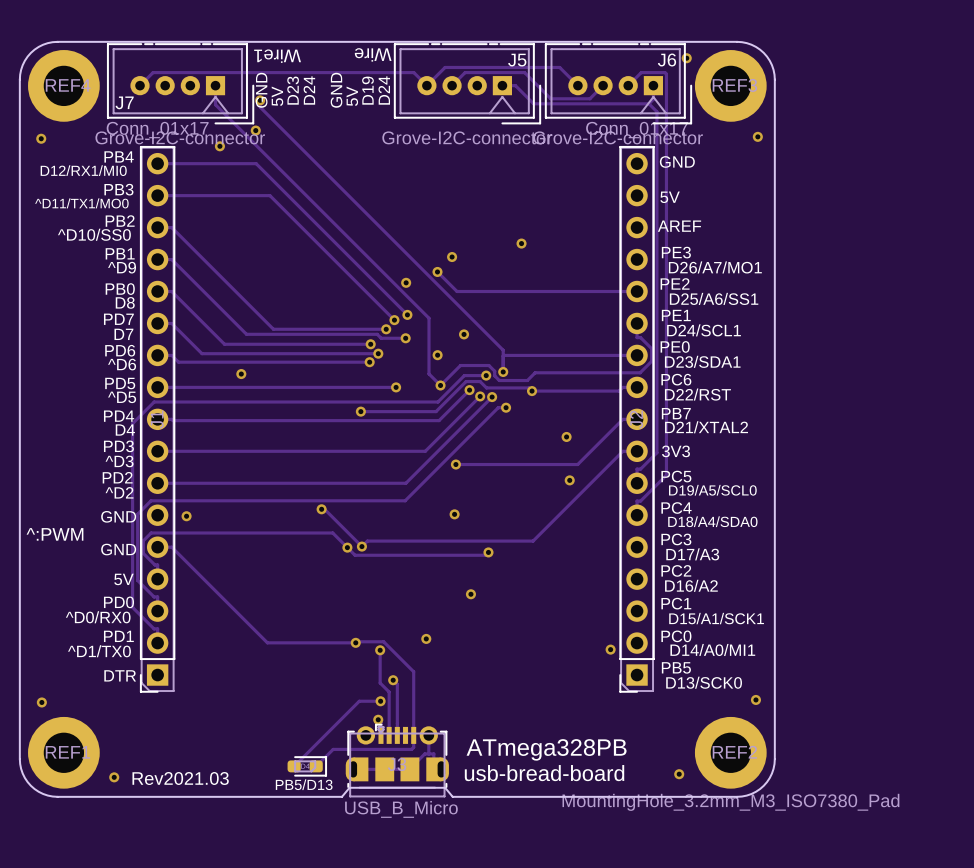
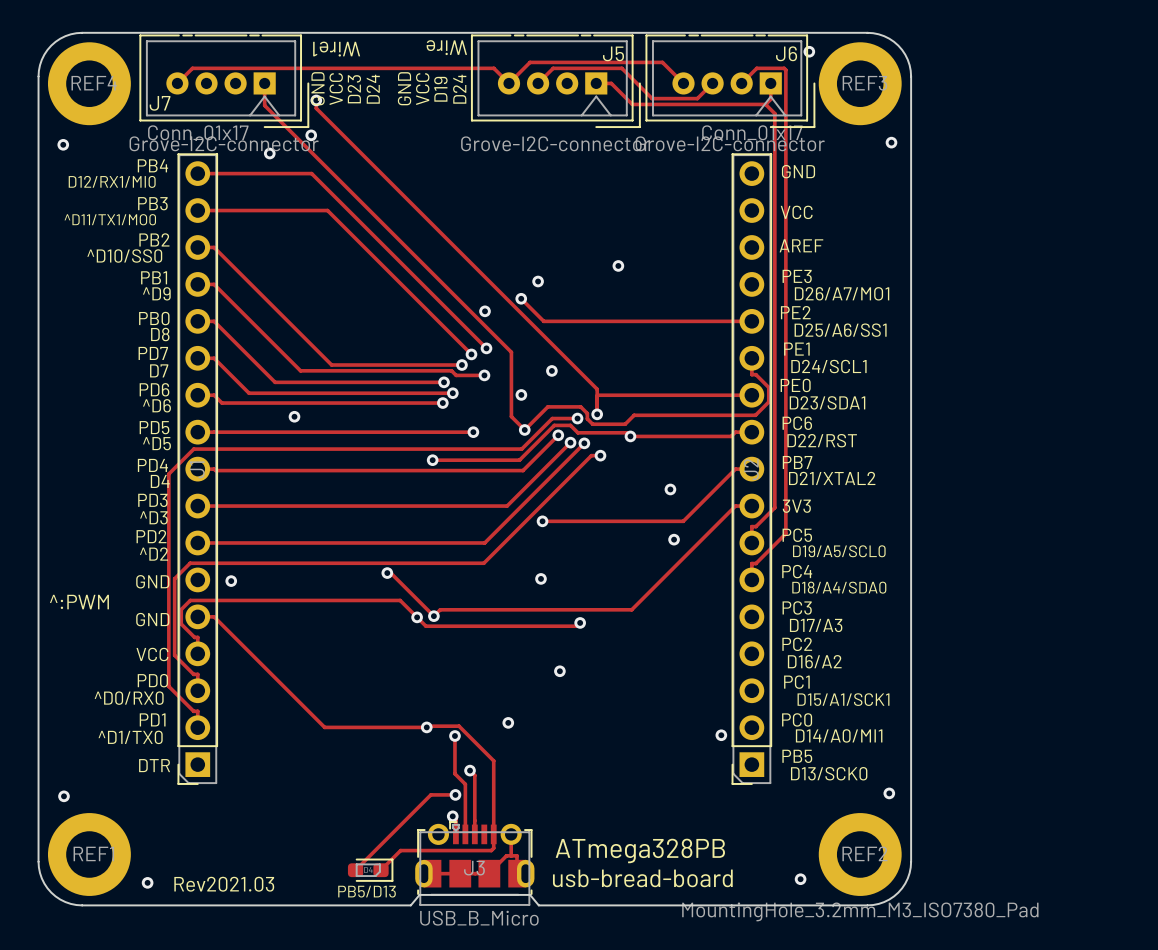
text: 5V (277, 96) -> VCC (336, 89)
text: 5V (352, 96) -> VCC (422, 89)
text: 5V (670, 197) -> VCC (796, 212)
text: 5V (123, 579) -> VCC (152, 654)

